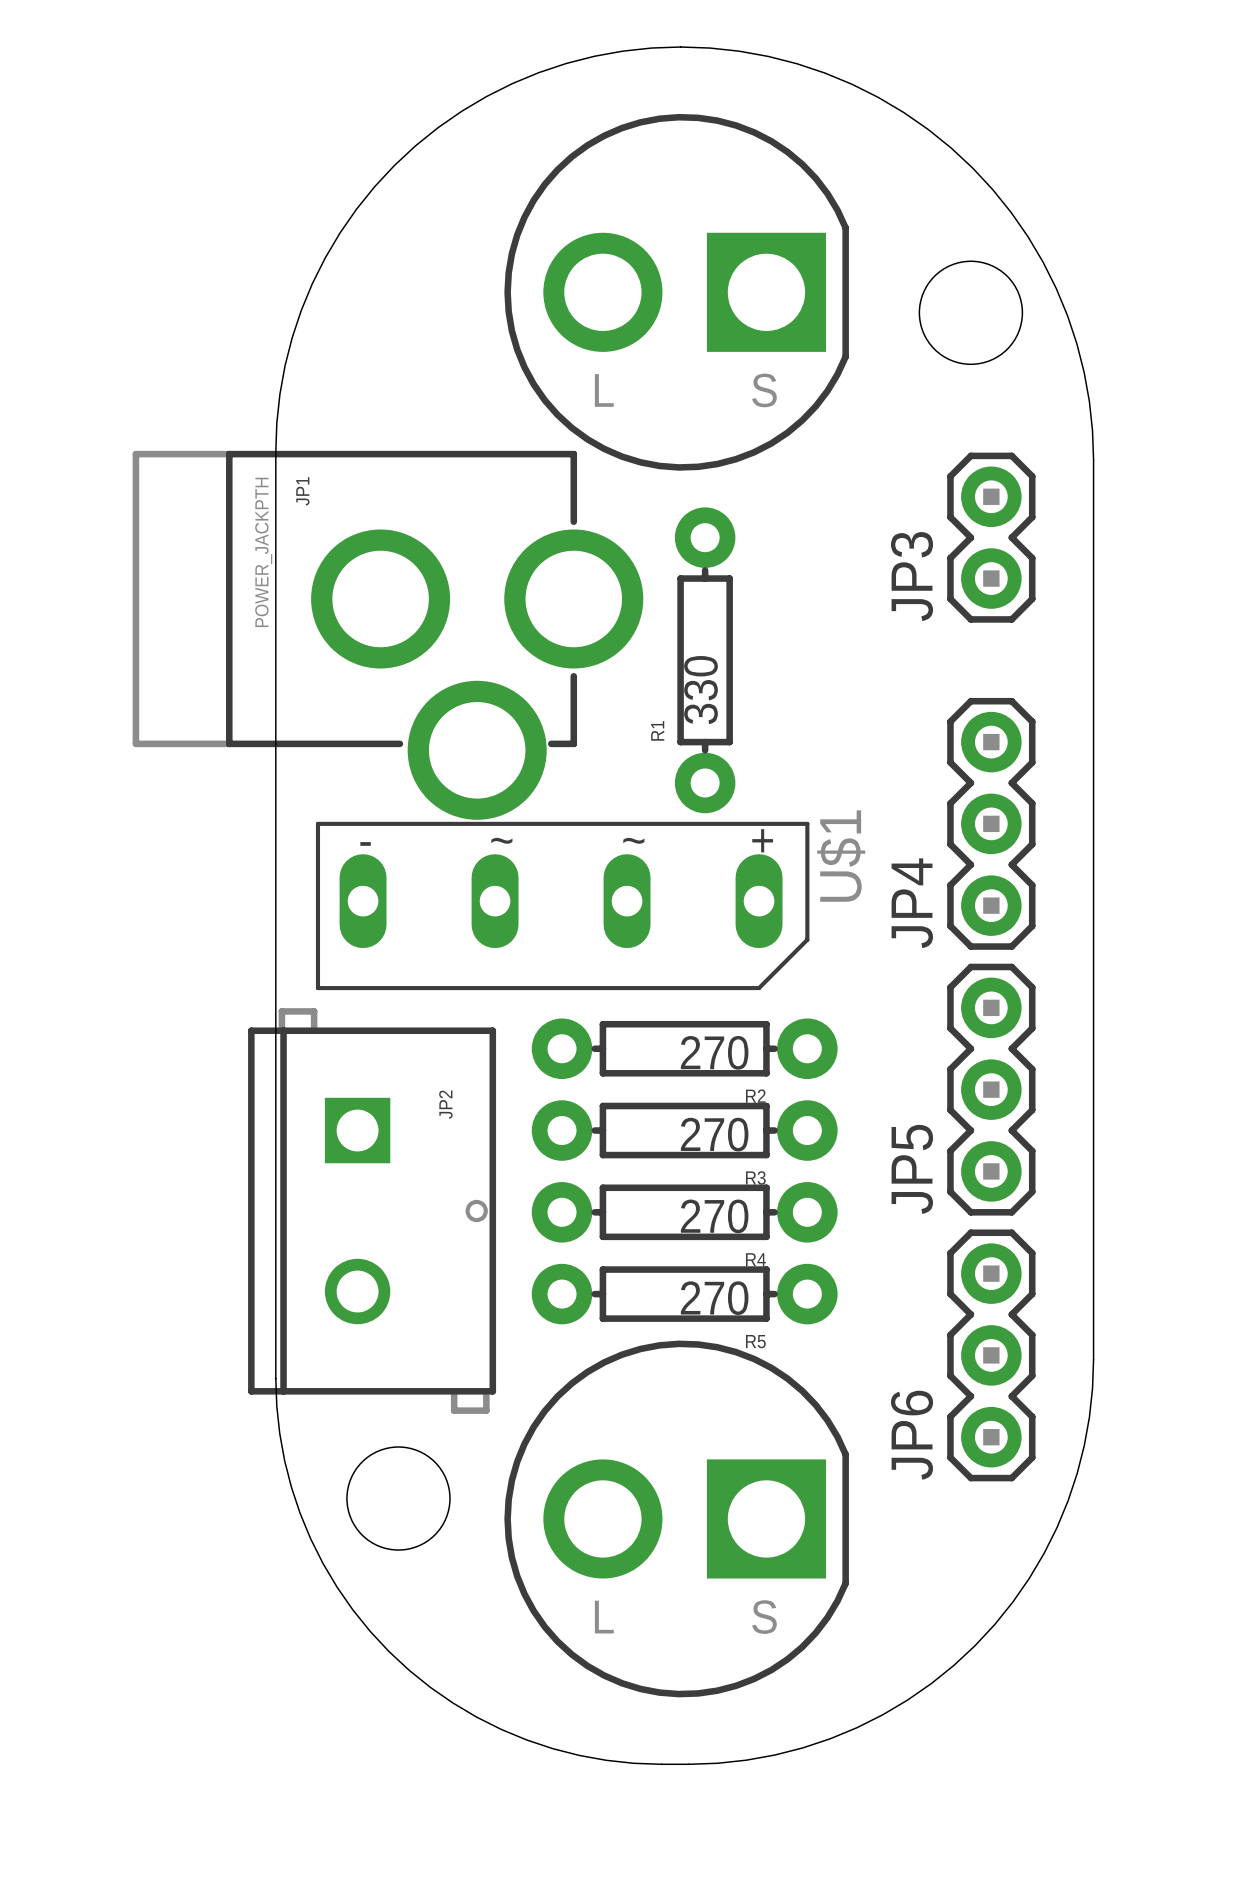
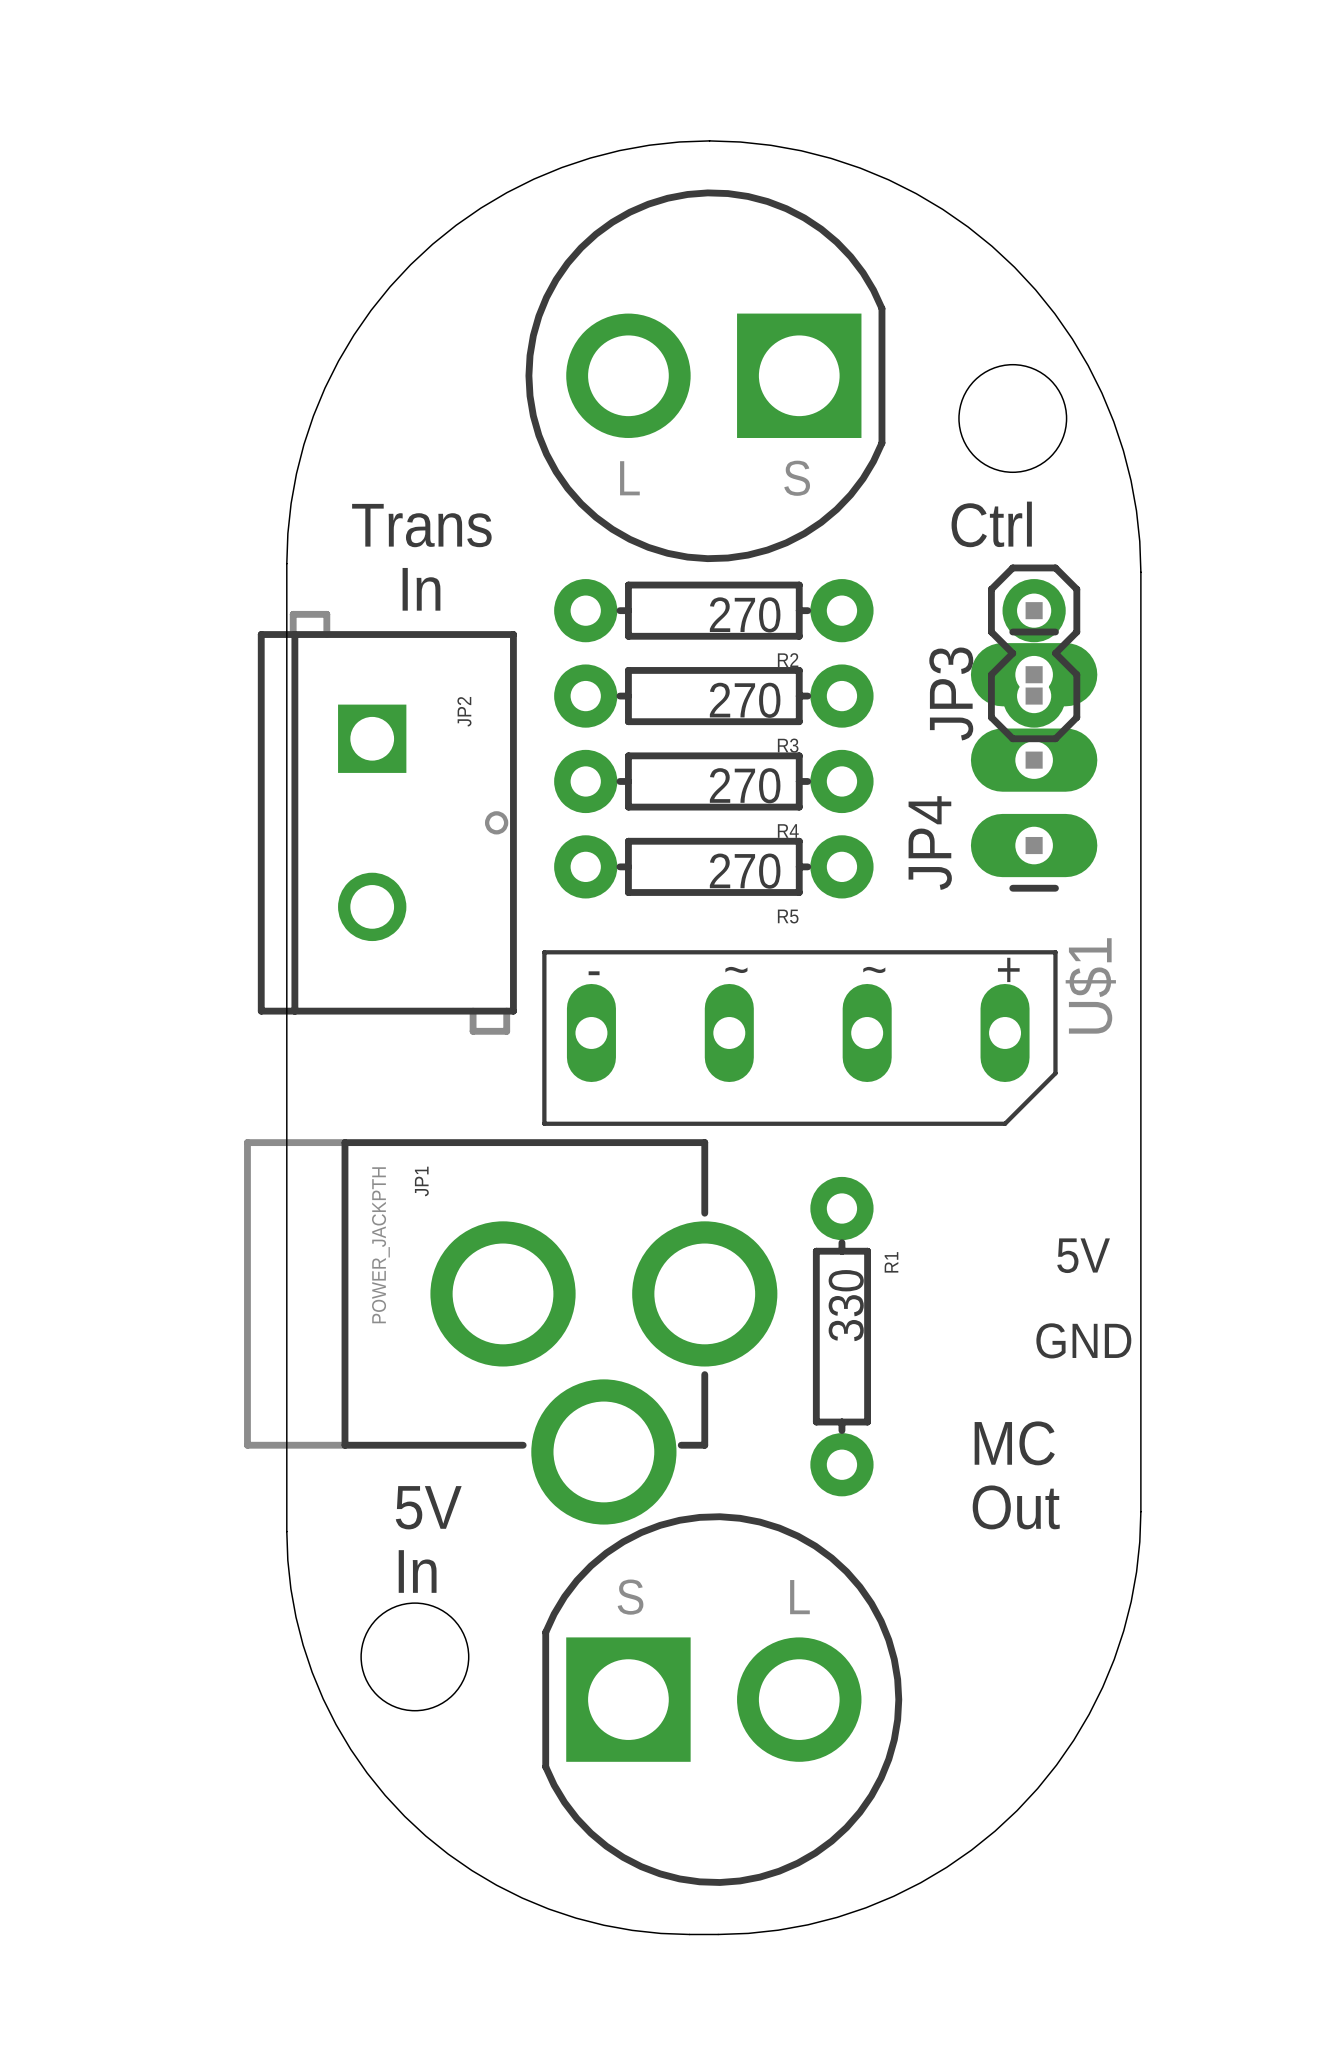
part position: (676, 292) -> (705, 375)
text: none -> Ctrl (991, 524)
text: none -> Trans (421, 525)
text: none -> In (421, 589)
JP1 position: (387, 635) -> (510, 1331)
R1 position: (705, 660) -> (841, 1336)
R1 value position: 330 (701, 690) -> 330 (846, 1305)
JP4 footprint: [947, 697, 1036, 950] -> [970, 628, 1098, 892]
R1 name position: R1 (657, 730) -> R1 (891, 1262)
U$1 position: (562, 905) -> (799, 1038)
R2 position: (684, 1048) -> (713, 610)
JP5: (991, 1089) -> none
text: none -> 5V (1083, 1255)
R3 position: (684, 1130) -> (713, 696)
text: none -> GND (1083, 1340)
JP2 position: (372, 1211) -> (387, 822)
R4 position: (684, 1212) -> (713, 781)
R5 position: (684, 1294) -> (713, 866)
text: none -> MC (1014, 1443)
part footprint: [504, 1340, 849, 1698] -> [542, 1513, 903, 1886]
text: none -> 5V (428, 1507)
text: none -> Out (1016, 1507)
JP6: (991, 1355) -> none
text: none -> In (417, 1571)

